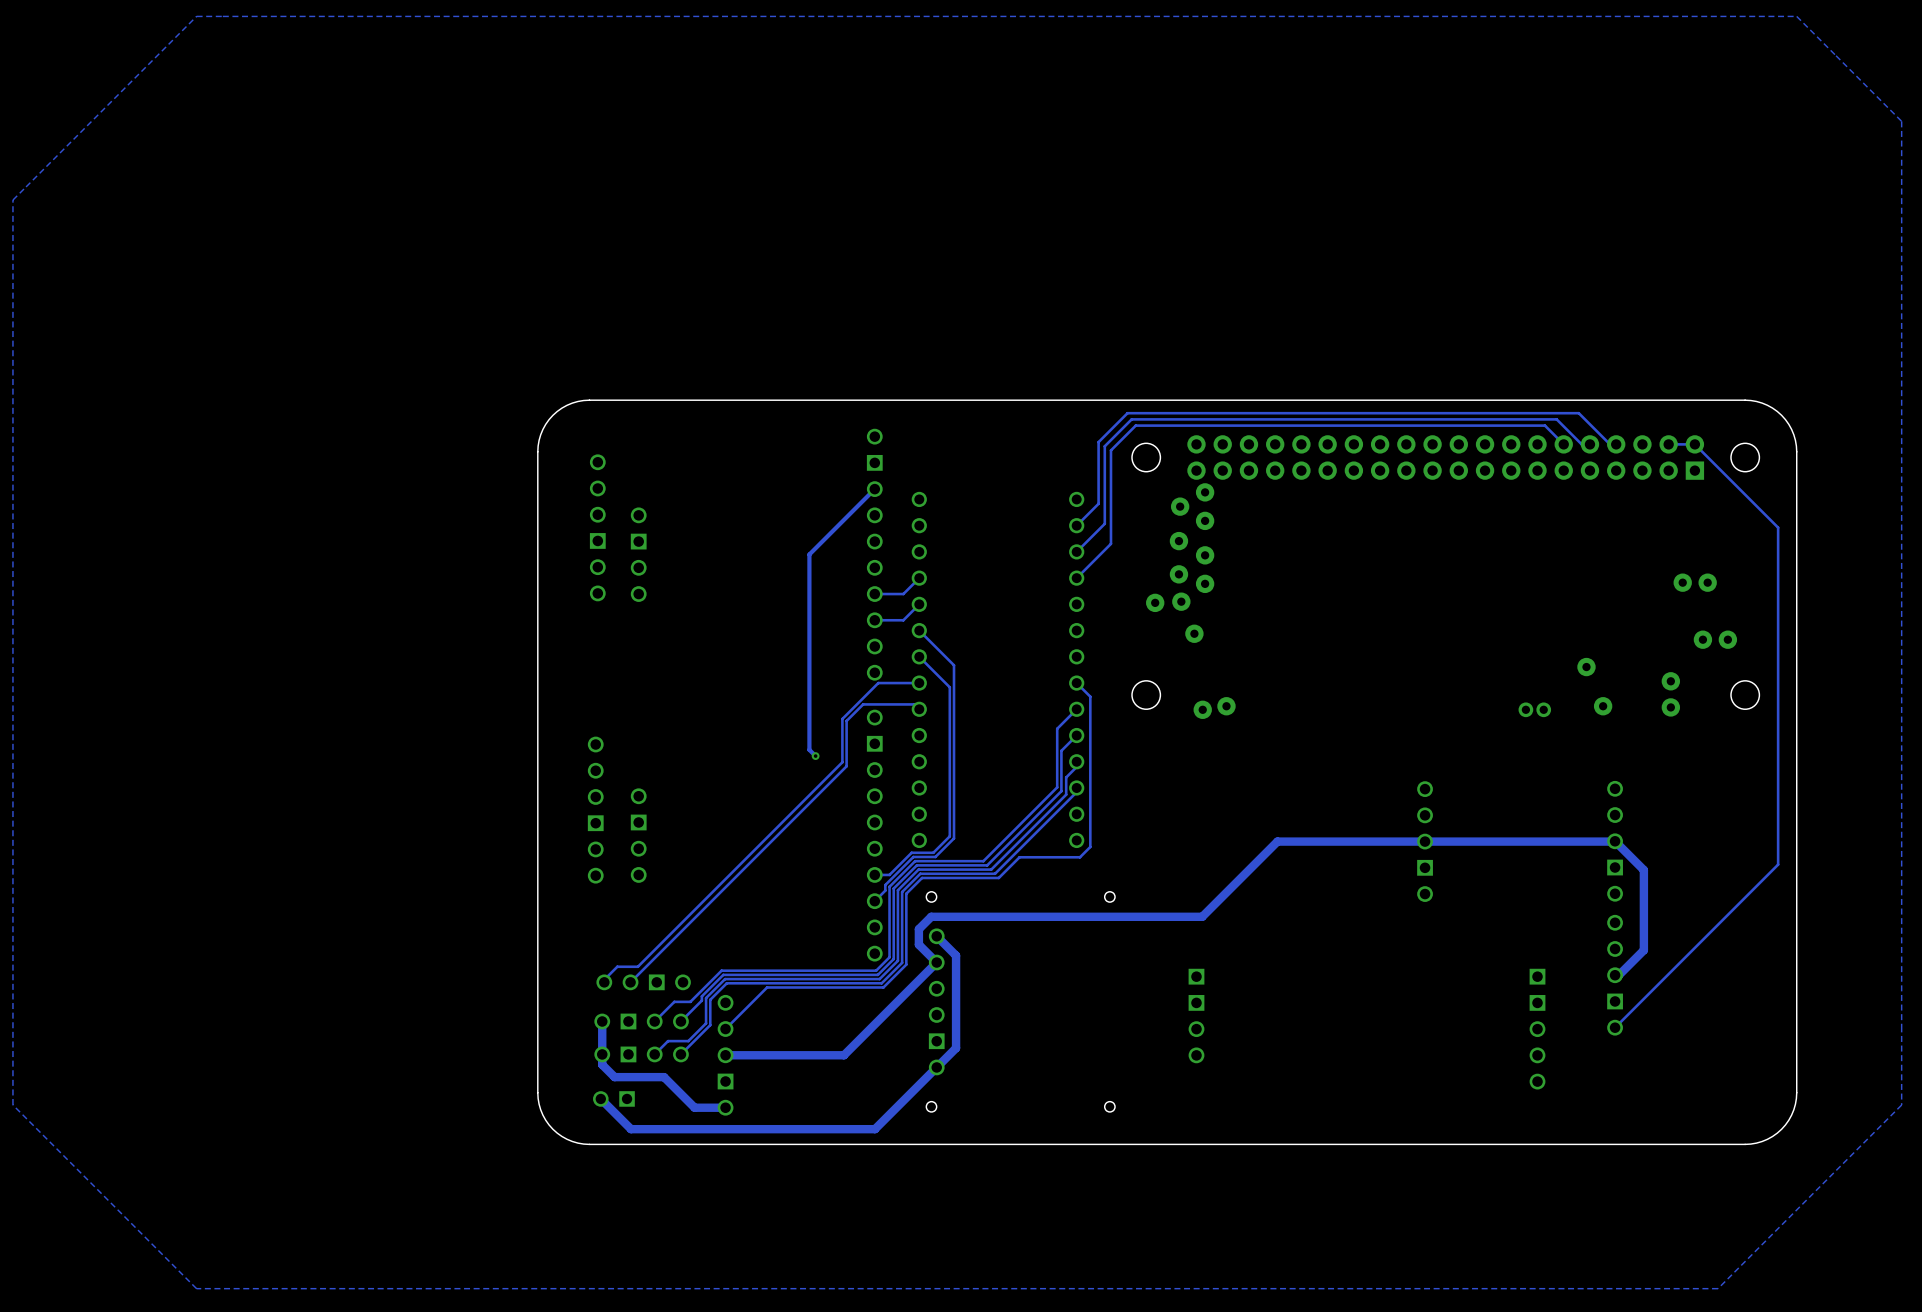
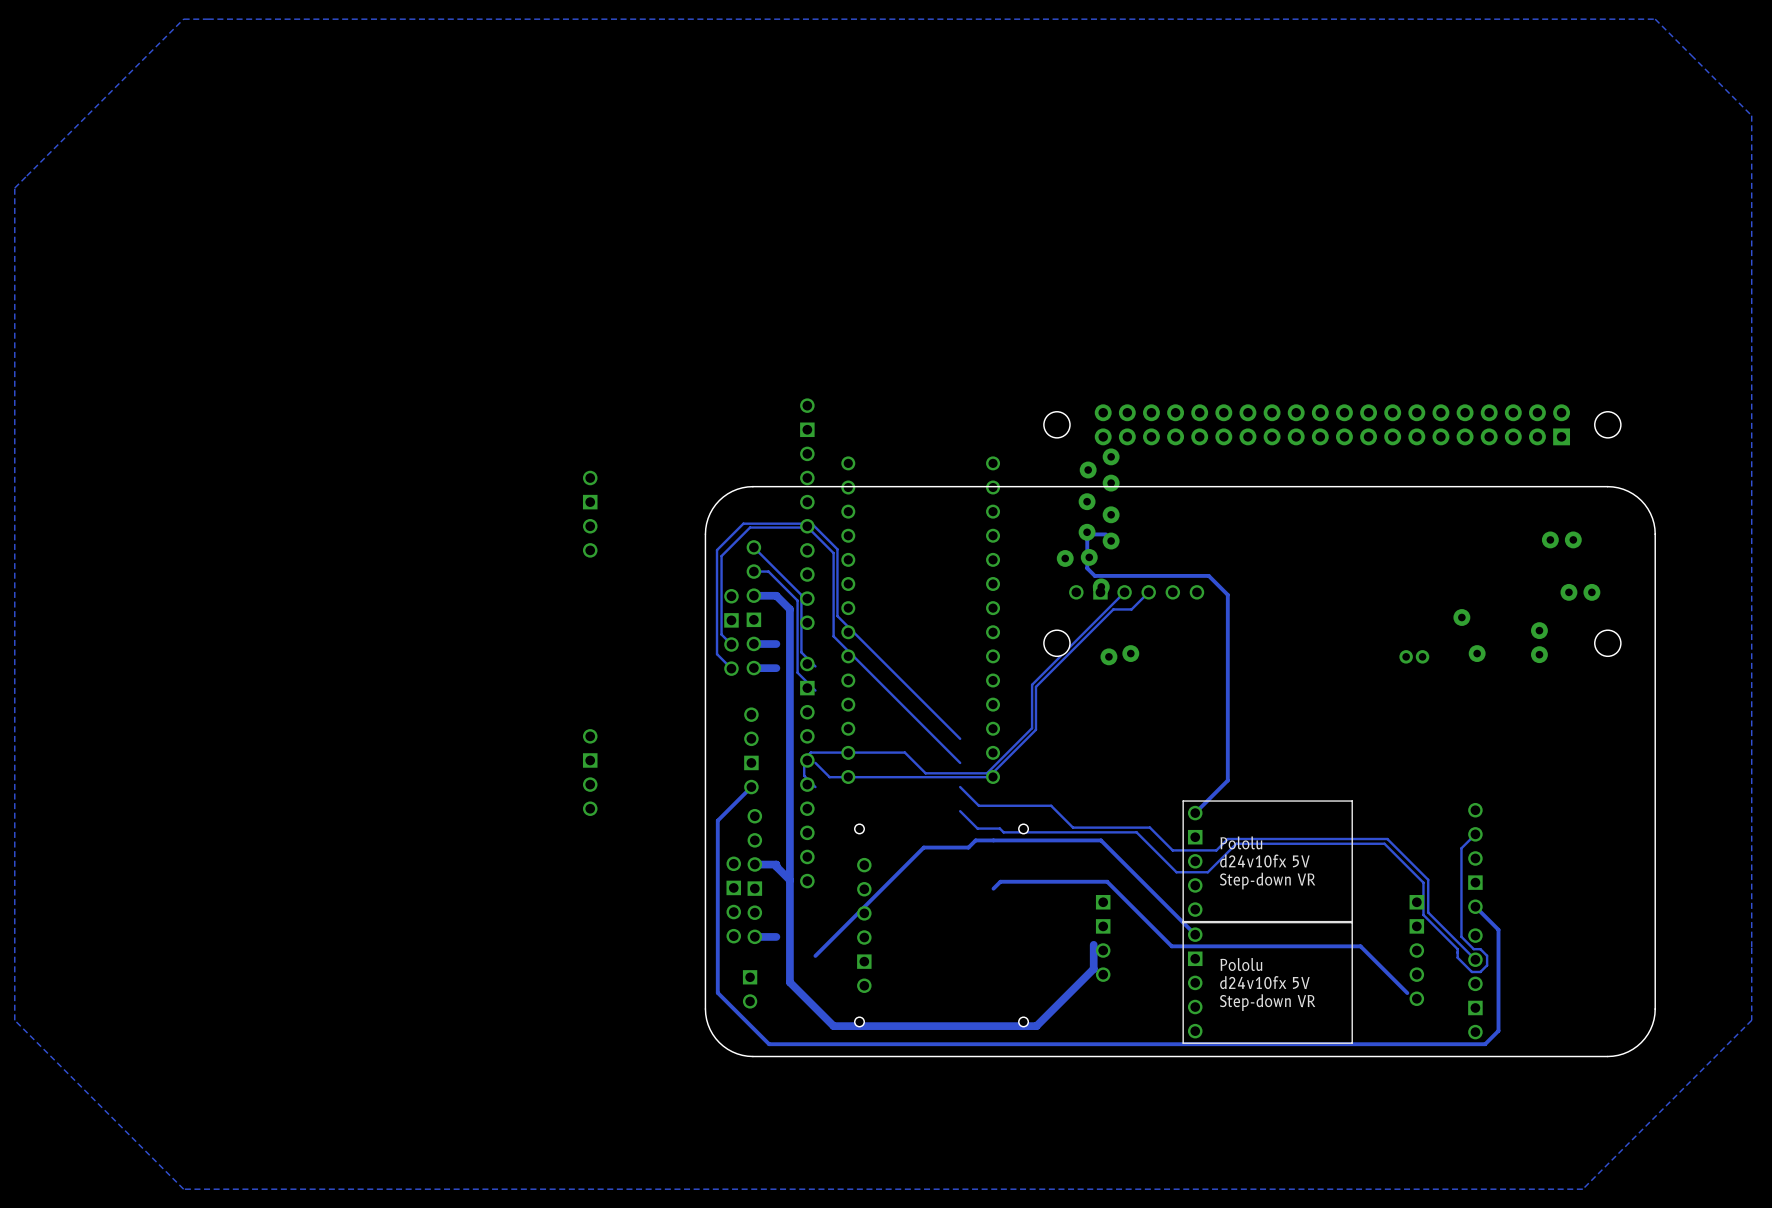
track: (1563, 444) (1544, 425) (1135, 425) (1110, 450) (1110, 543) (1076, 578) -> none
track: (1589, 444) (1581, 444) (1556, 419) (1131, 419) (1104, 446) (1104, 523) (1076, 551) -> none
track: (1616, 444) (1610, 444) (1578, 413) (1127, 413) (1098, 442) (1098, 503) (1076, 525) -> none
track: (1668, 444) (1694, 444) (1778, 527) (1778, 864) (1615, 1027) -> none
track: (874, 489) (809, 554) (809, 749) (815, 756) -> none
part: (597, 527) -> none
track: none -> (1105, 534) (1092, 534) (1087, 539) (1087, 568) (1094, 575) (1208, 575) (1227, 594) (1227, 780) (1195, 813)
board edge: (1796, 576) (1795, 440) (1788, 424) (1777, 411) (1762, 403) (1750, 400) (589, 400) (572, 403) (561, 408) (545, 424) (540, 434) (537, 451) (537, 1092) (540, 1109) (549, 1124) (557, 1133) (572, 1141) (583, 1144) (815, 1144) -> (1655, 534) (1652, 518) (1641, 500) (1623, 489) (1607, 486) (752, 486) (737, 489) (727, 493) (712, 508) (708, 518) (705, 534) (705, 1009) (708, 1024) (719, 1042) (737, 1053) (752, 1056)
track: (919, 578) (903, 594) (874, 594) -> none
track: none -> (753, 547) (801, 594) (801, 652) (815, 666)
track: (919, 604) (903, 620) (874, 620) -> none
track: none -> (753, 571) (768, 571) (797, 600) (797, 672) (815, 690)
track: (919, 630) (954, 665) (954, 838) (935, 856) (913, 856) (885, 885) (885, 890) (874, 901) -> none
track: none -> (1124, 592) (1032, 684) (1032, 728) (986, 773) (925, 773) (904, 752) (810, 752) (804, 759) (804, 775) (815, 787)
part: none -> (1136, 592)
track: none -> (1148, 592) (1131, 609) (1113, 609) (1035, 686) (1035, 729) (988, 777) (829, 777) (815, 762)
track: none -> (753, 595) (776, 595) (789, 609) (789, 982) (833, 1026) (1036, 1026) (1093, 968) (1093, 944)
part: none -> (753, 607)
track: (919, 656) (949, 687) (949, 836) (933, 852) (911, 852) (889, 874) (874, 874) -> none
part: none -> (731, 632)
track: (919, 683) (878, 683) (842, 718) (842, 762) (637, 966) (617, 966) (604, 979) (604, 982) -> none
track: (1076, 683) (1090, 696) (1090, 846) (1080, 857) (1019, 857) (998, 877) (922, 877) (906, 893) (906, 964) (883, 987) (767, 987) (725, 1029) -> none
track: none -> (776, 644) (753, 644)
track: none -> (731, 644) (721, 634) (721, 556) (750, 527) (808, 527) (833, 553) (833, 636) (960, 762)
track: (919, 709) (914, 704) (863, 704) (846, 720) (846, 766) (630, 982) -> none
track: (1076, 709) (1057, 728) (1057, 787) (983, 861) (915, 861) (889, 886) (889, 957) (876, 970) (721, 970) (690, 1001) (674, 1001) (654, 1021) -> none
track: none -> (731, 668) (717, 654) (717, 550) (743, 523) (811, 523) (837, 549) (837, 616) (960, 738)
track: none -> (776, 668) (753, 668)
track: (1076, 735) (1061, 750) (1061, 791) (987, 865) (916, 865) (893, 888) (893, 959) (877, 974) (723, 974) (680, 1021) -> none
via: (815, 756) -> none
track: (1076, 761) (1076, 766) (1066, 777) (1066, 794) (991, 869) (918, 869) (897, 890) (897, 960) (879, 979) (725, 979) (706, 998) (706, 1023) (688, 1041) (668, 1041) (654, 1054) -> none
track: (1076, 787) (1076, 792) (995, 873) (920, 873) (902, 891) (902, 962) (881, 983) (726, 983) (710, 999) (710, 1025) (680, 1054) -> none
part: (595, 810) -> none
part: none -> (751, 750)
part: (1425, 841) -> none
part position: (1615, 841) -> (1475, 858)
track: none -> (751, 787) (717, 820) (717, 992) (769, 1044) (1485, 1044) (1498, 1030) (1498, 929) (1475, 906)
track: none -> (960, 787) (978, 805) (1051, 805) (1073, 827) (1149, 827) (1172, 850) (1216, 850) (1227, 839) (1387, 839) (1428, 879) (1428, 912) (1475, 959)
track: none -> (960, 811) (977, 828) (999, 828) (1003, 832) (1136, 832) (1176, 872) (1207, 872) (1236, 843) (1384, 843) (1423, 882) (1423, 914) (1457, 949) (1457, 957) (1471, 971) (1480, 971) (1487, 965) (1487, 955) (1480, 949) (1473, 949) (1461, 936) (1461, 848) (1475, 834)
track: none -> (754, 864) (776, 864) (789, 880)
track: (936, 936) (956, 955) (956, 1048) (875, 1129) (631, 1129) (600, 1098) -> none
part: none -> (754, 876)
track: none -> (993, 888) (1000, 881) (1107, 881) (1171, 946) (1360, 946) (1407, 993)
part: none -> (733, 899)
track: (1615, 975) (1618, 975) (1643, 950) (1643, 870) (1615, 841) (1277, 841) (1202, 916) (931, 916) (918, 929) (918, 944) (936, 962) (843, 1055) (725, 1055) -> none
part side: top (1615, 975) -> bottom (1267, 861)
part: (643, 982) -> none
track: none -> (1195, 934) (1101, 840) (975, 840) (968, 847) (923, 847) (815, 955)
track: none -> (776, 936) (754, 936)
track: (602, 1021) (602, 1064) (614, 1077) (664, 1077) (694, 1107) (725, 1107) -> none
part: (641, 1021) -> none
part: (641, 1054) -> none
part: (725, 1055) -> none
part: none -> (1267, 982)
part: none -> (1475, 983)
part rotation: 0° (613, 1098) -> 90° counterclockwise (750, 989)
part position: (613, 1098) -> (750, 989)

